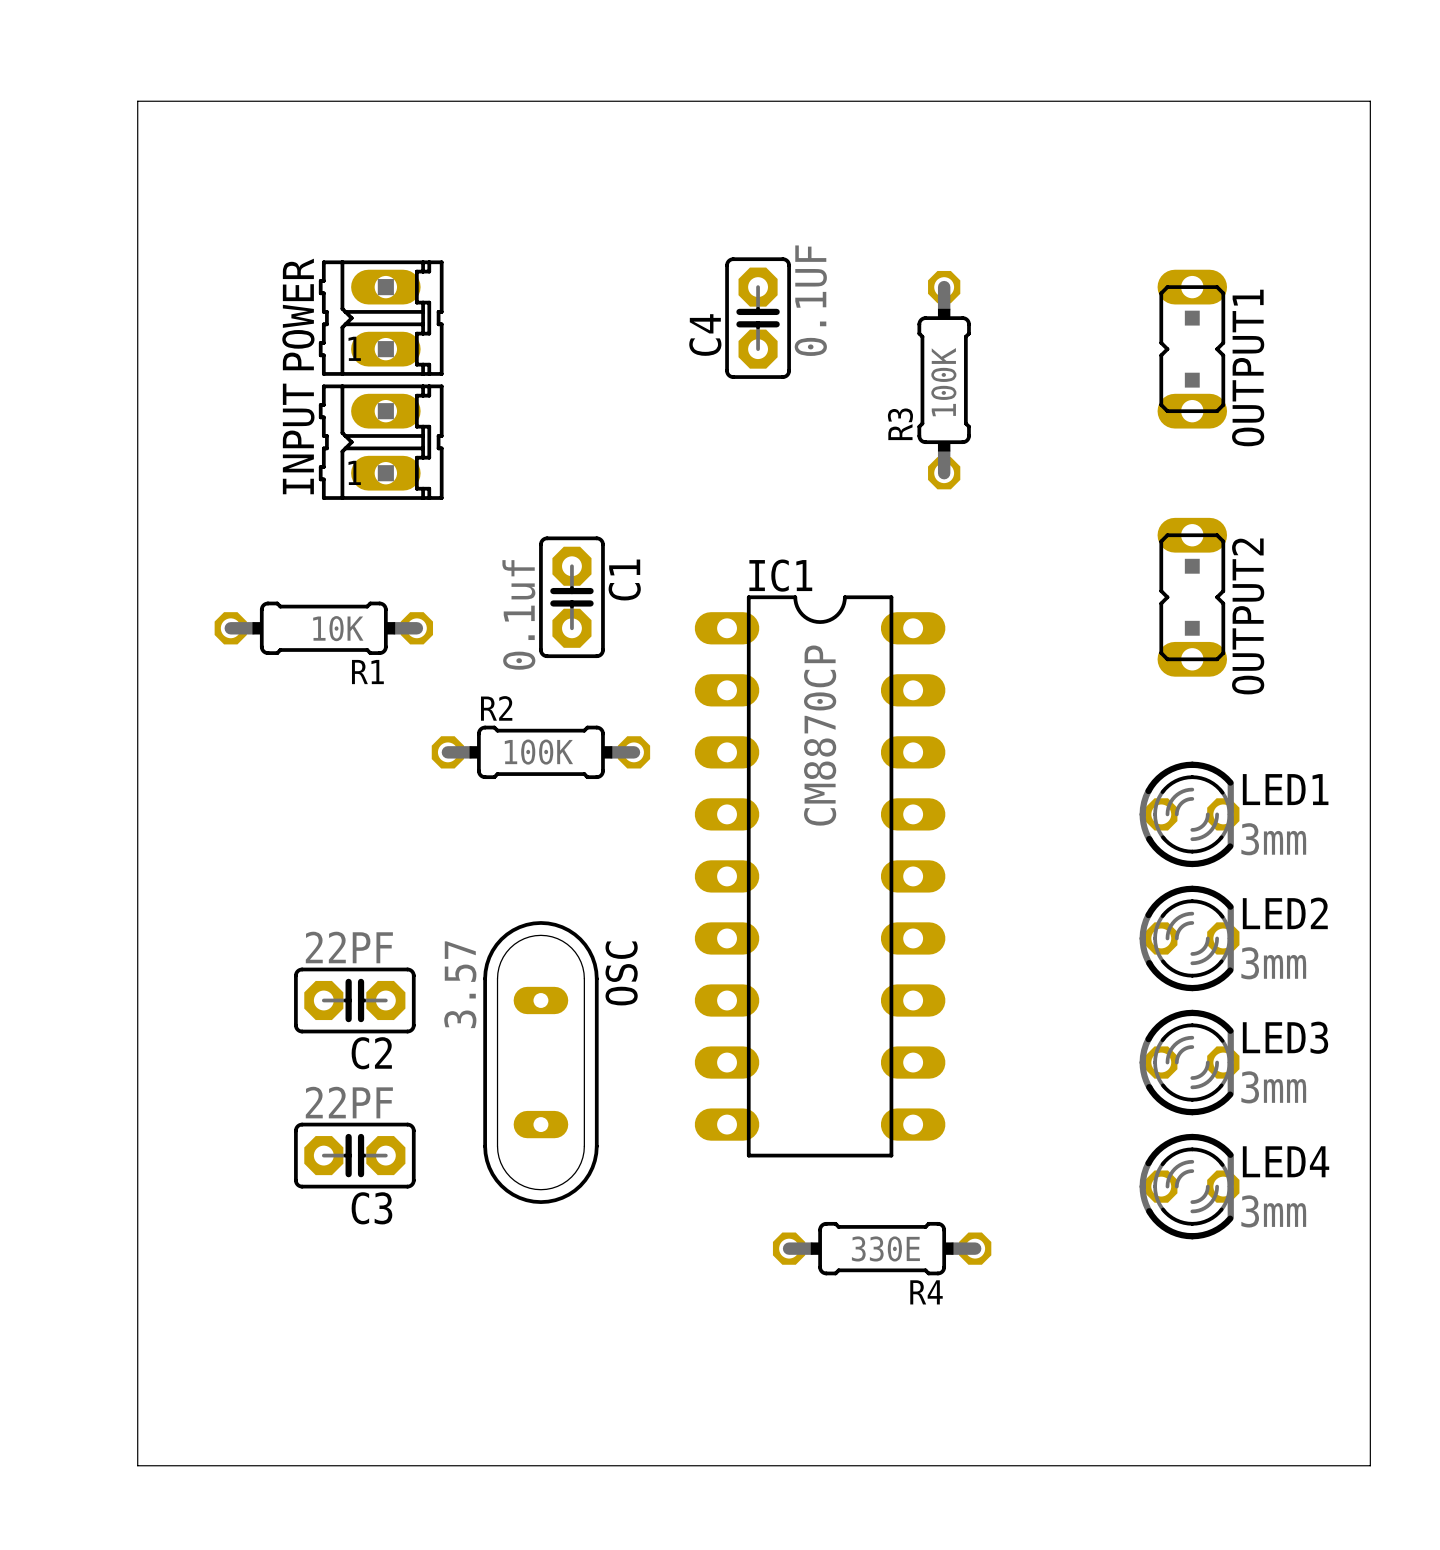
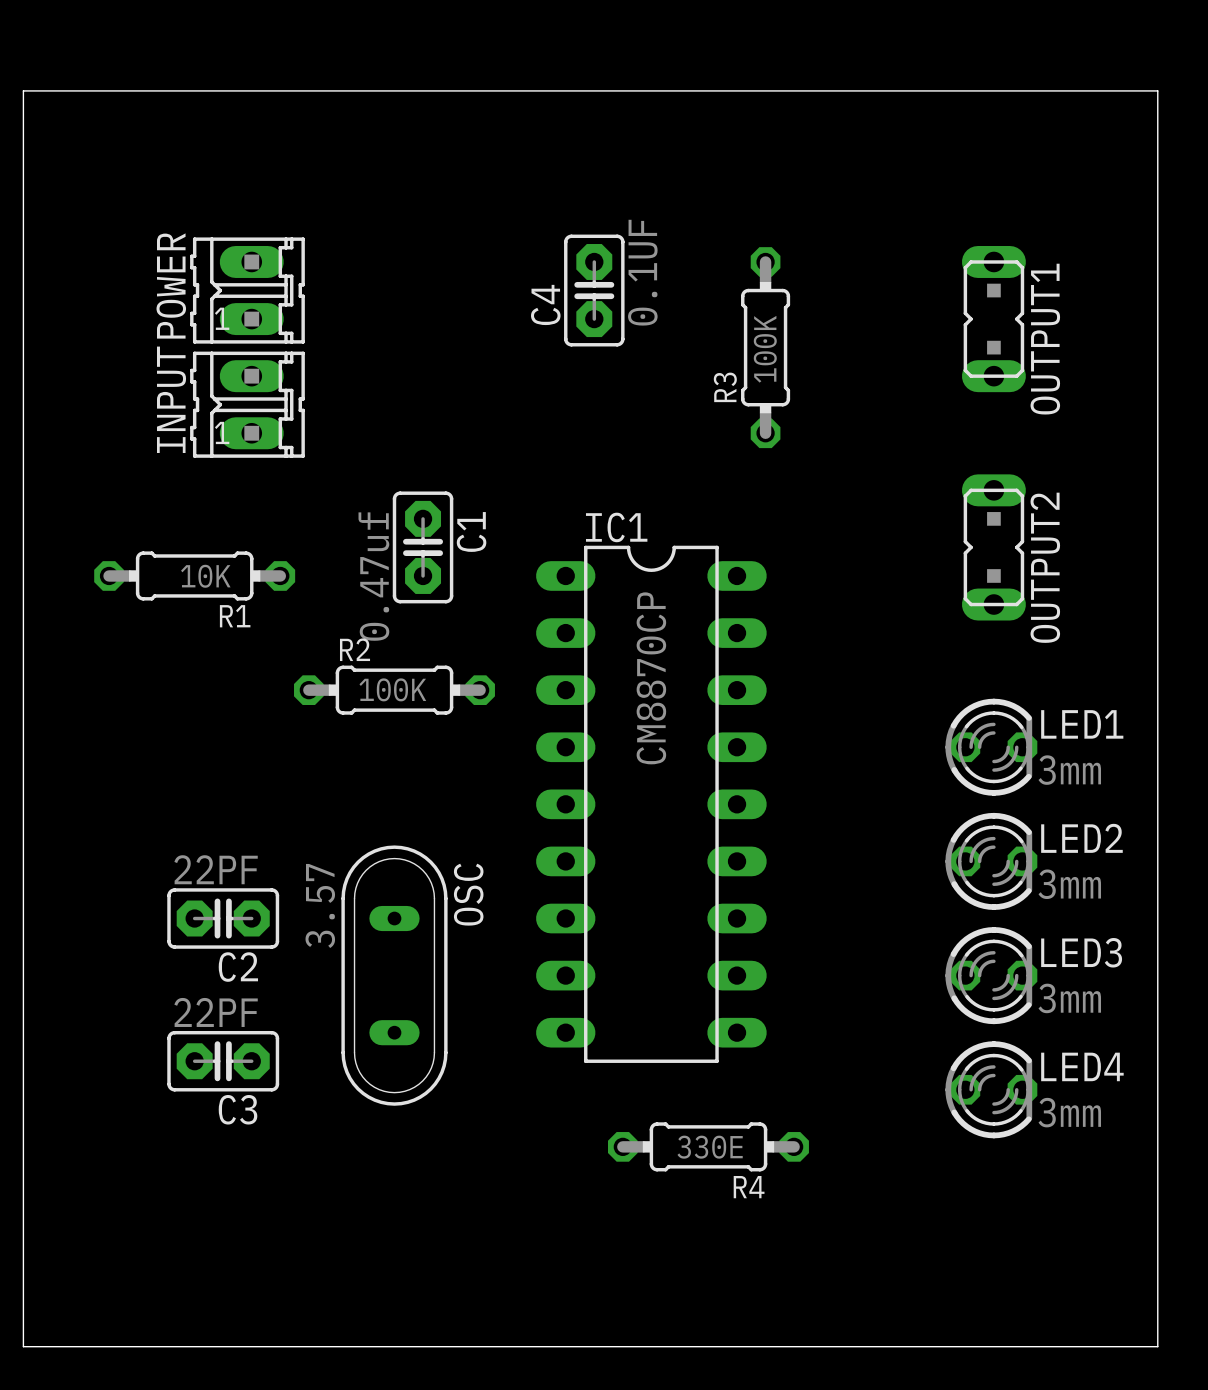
C1 value: 0.1uf (518, 614) -> 0.47uf (373, 576)

